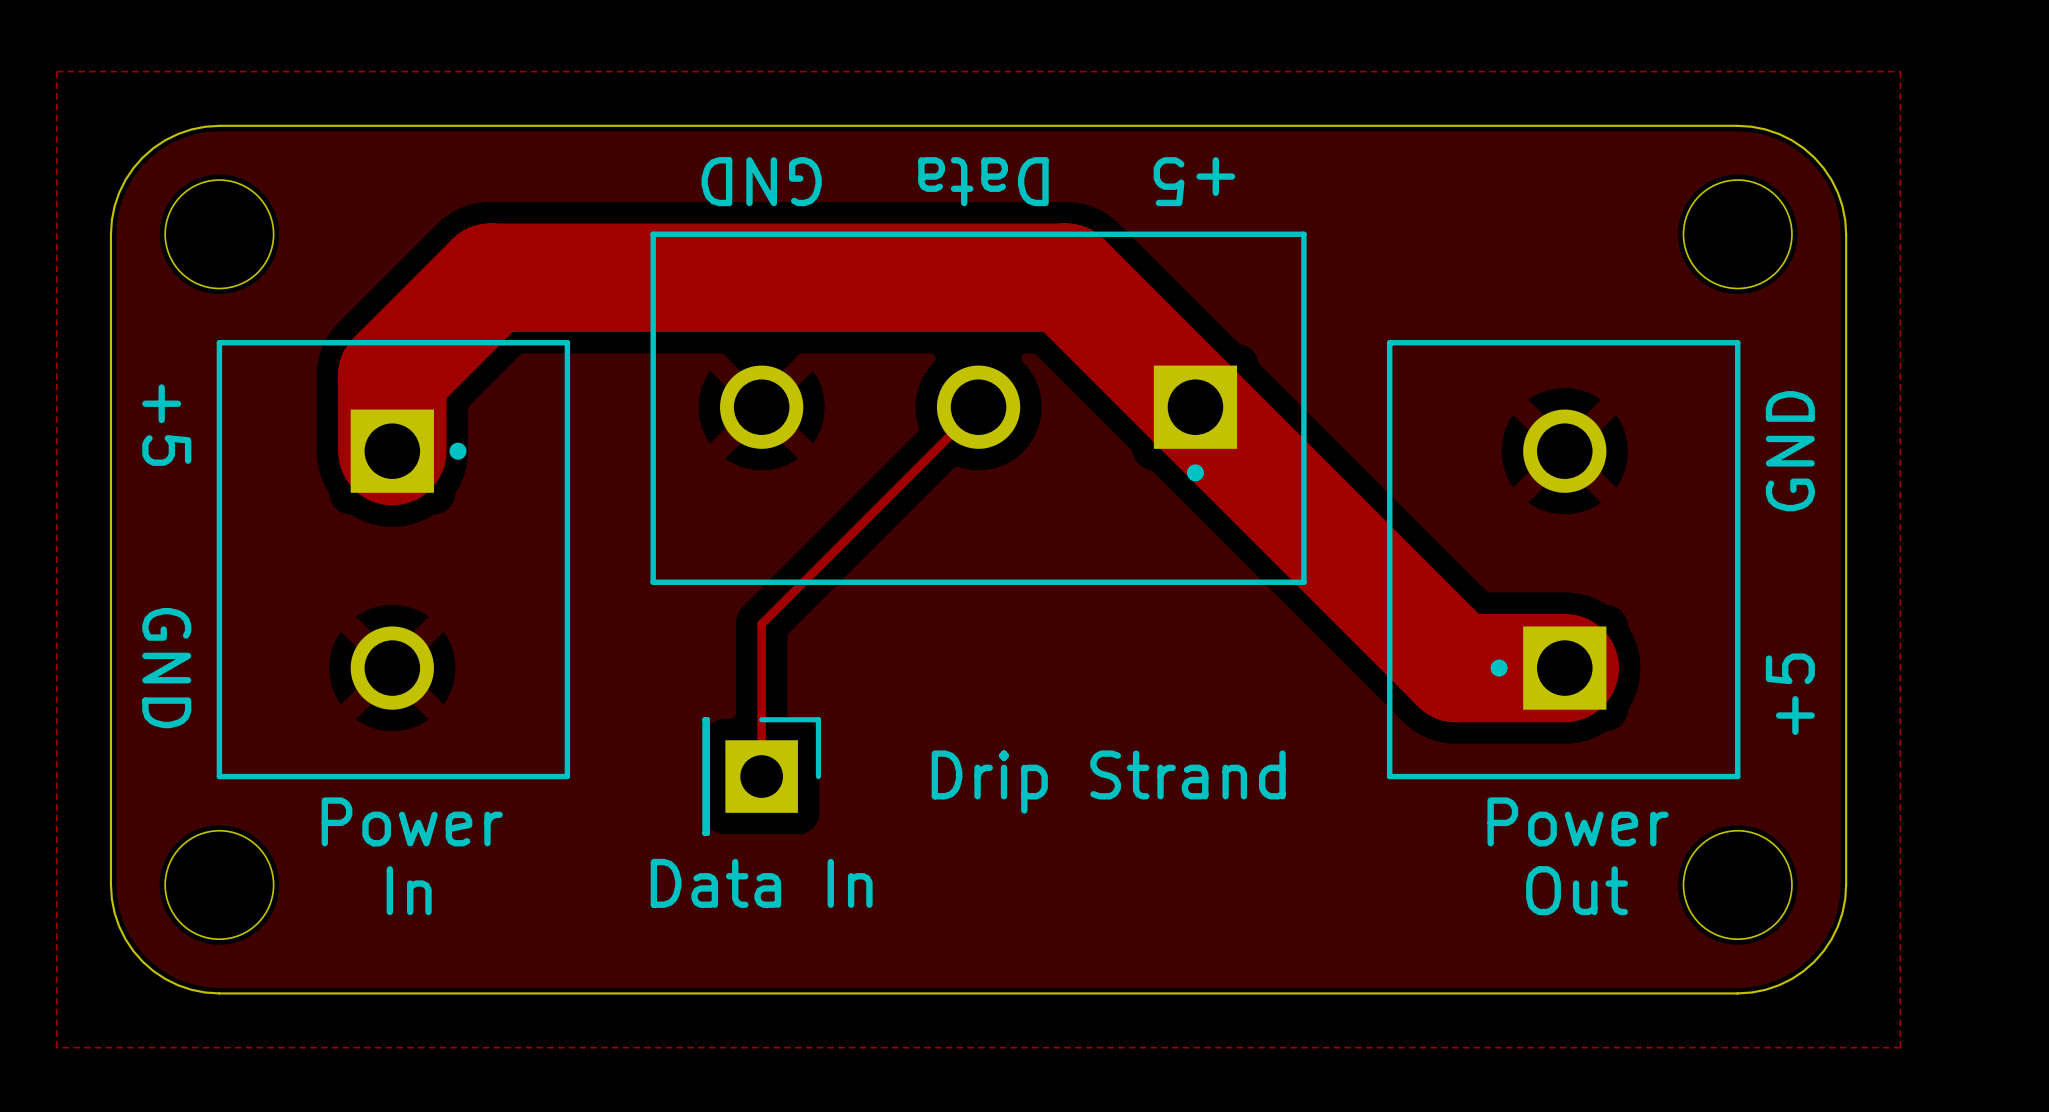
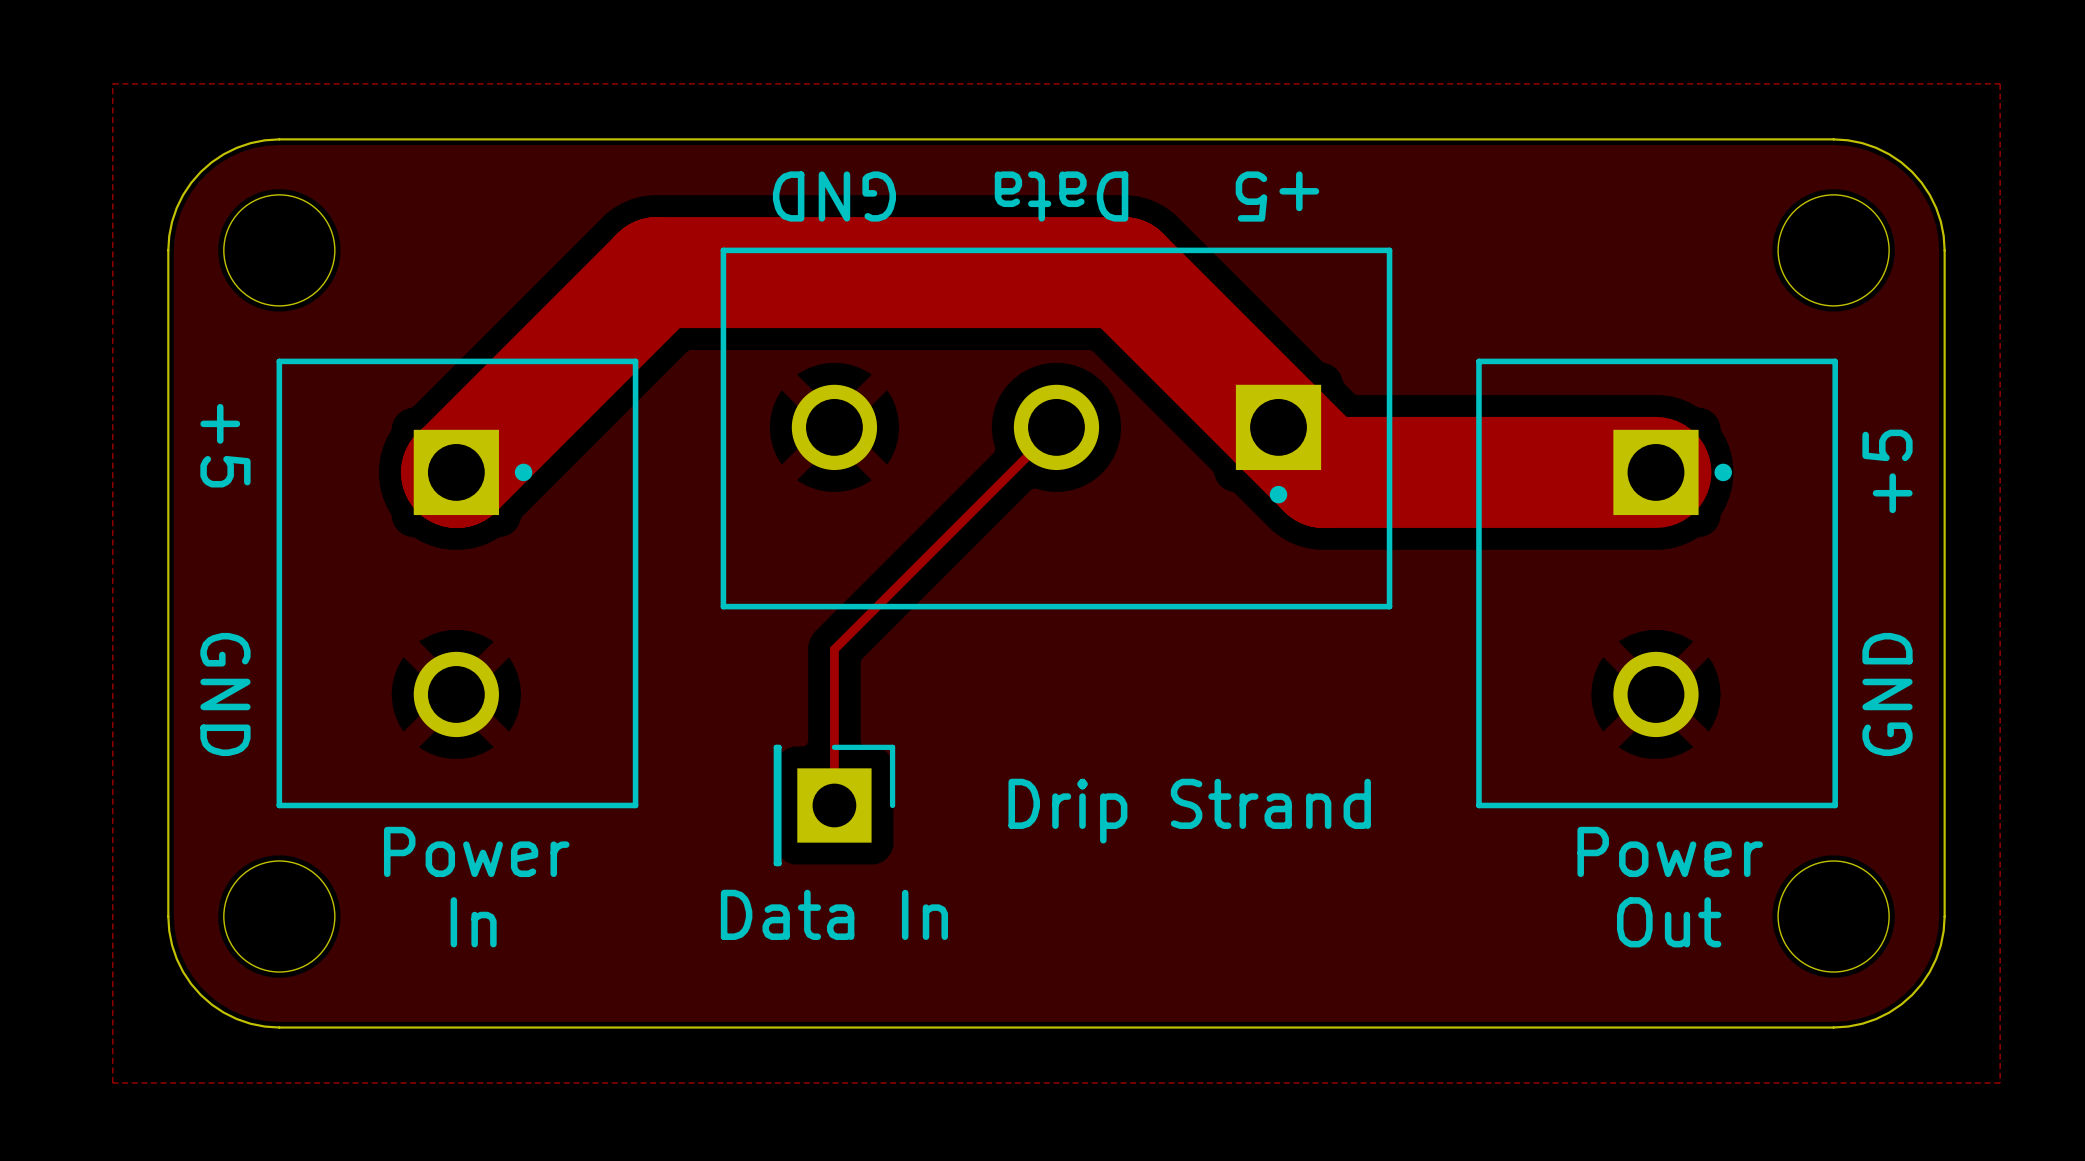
track: (1065, 277) (490, 277) (392, 375) (392, 451) -> (1145, 294) (1123, 272) (656, 272) (456, 472)
track: (1239, 451) (1456, 668) (1564, 668) -> (1323, 472) (1655, 472)
text: GND (1790, 451) -> +5 (1887, 471)
part rotation: 0° (1563, 559) -> 180° (1657, 583)
text: +5 (1790, 694) -> GND (1887, 694)

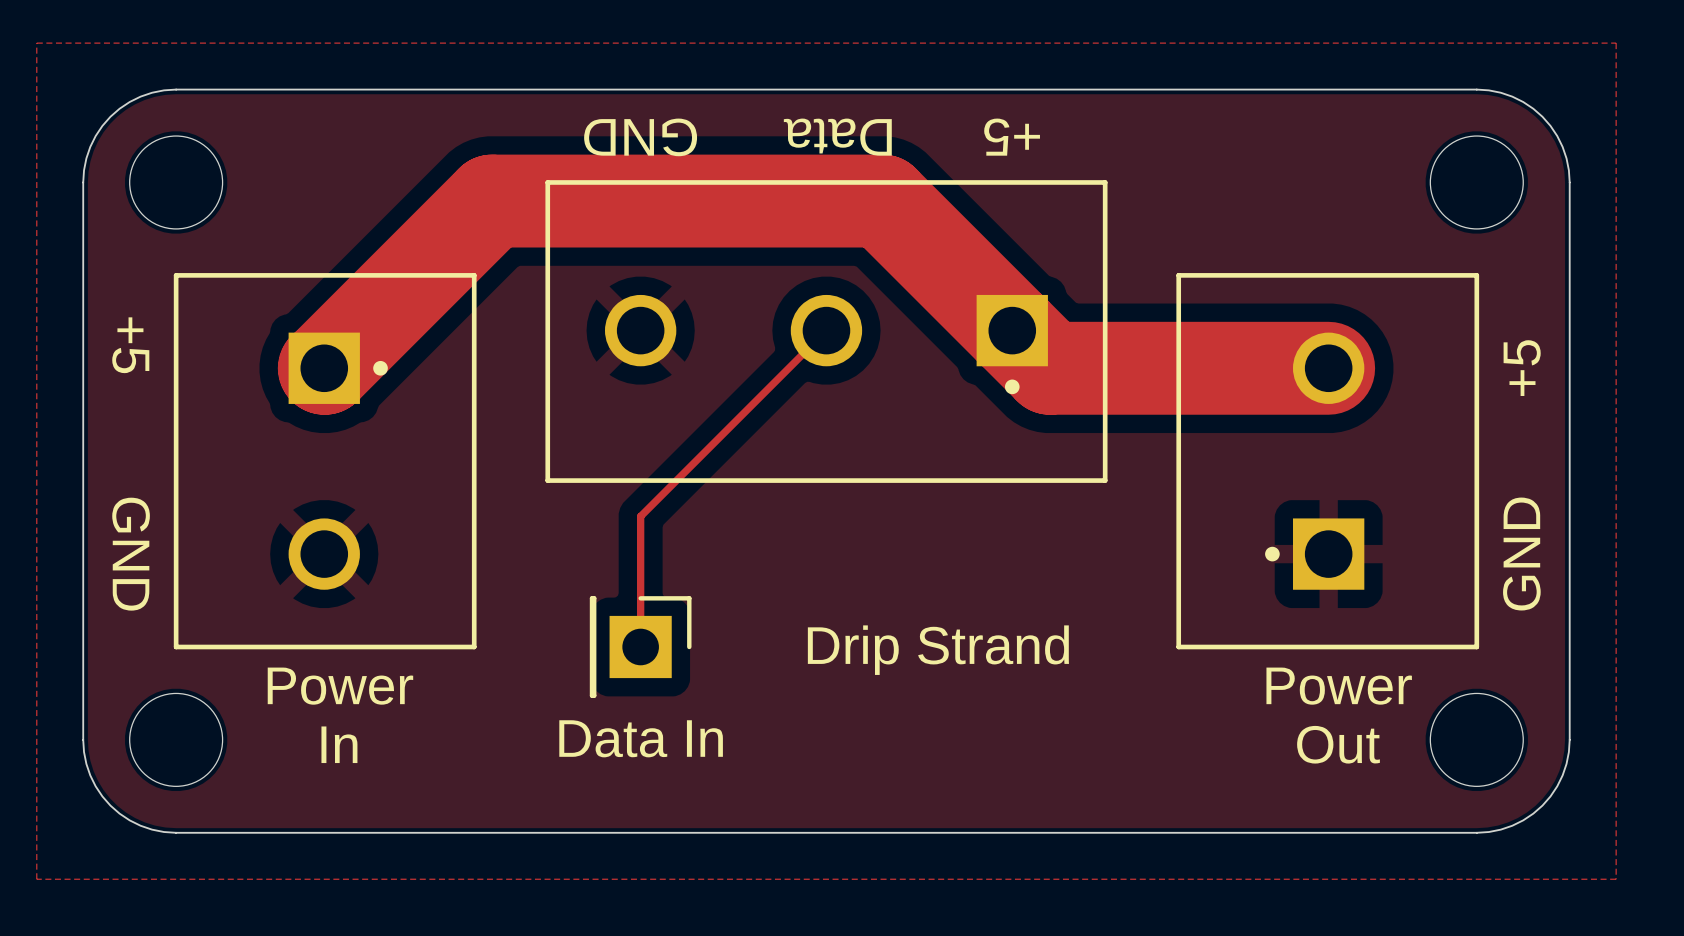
part rotation: 0° (1657, 583) -> 180° (1327, 461)

